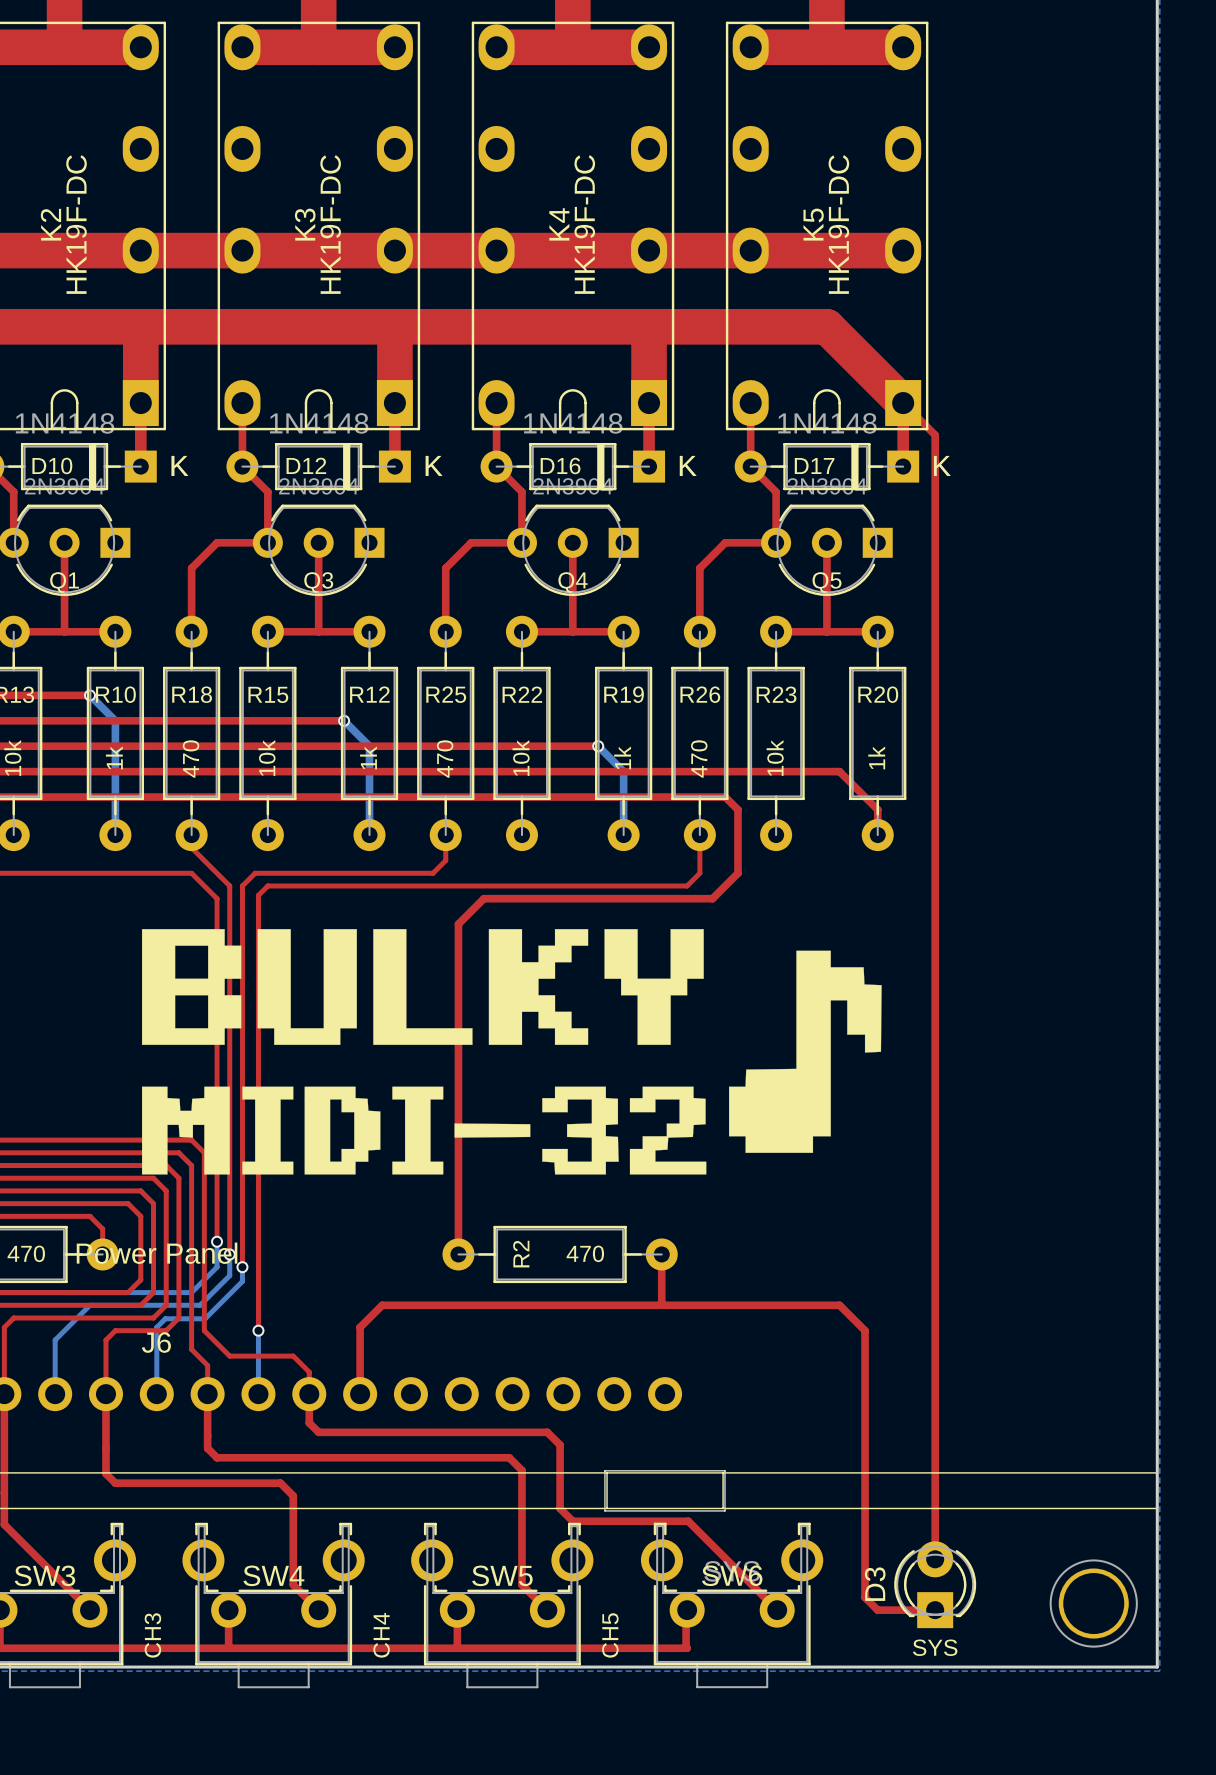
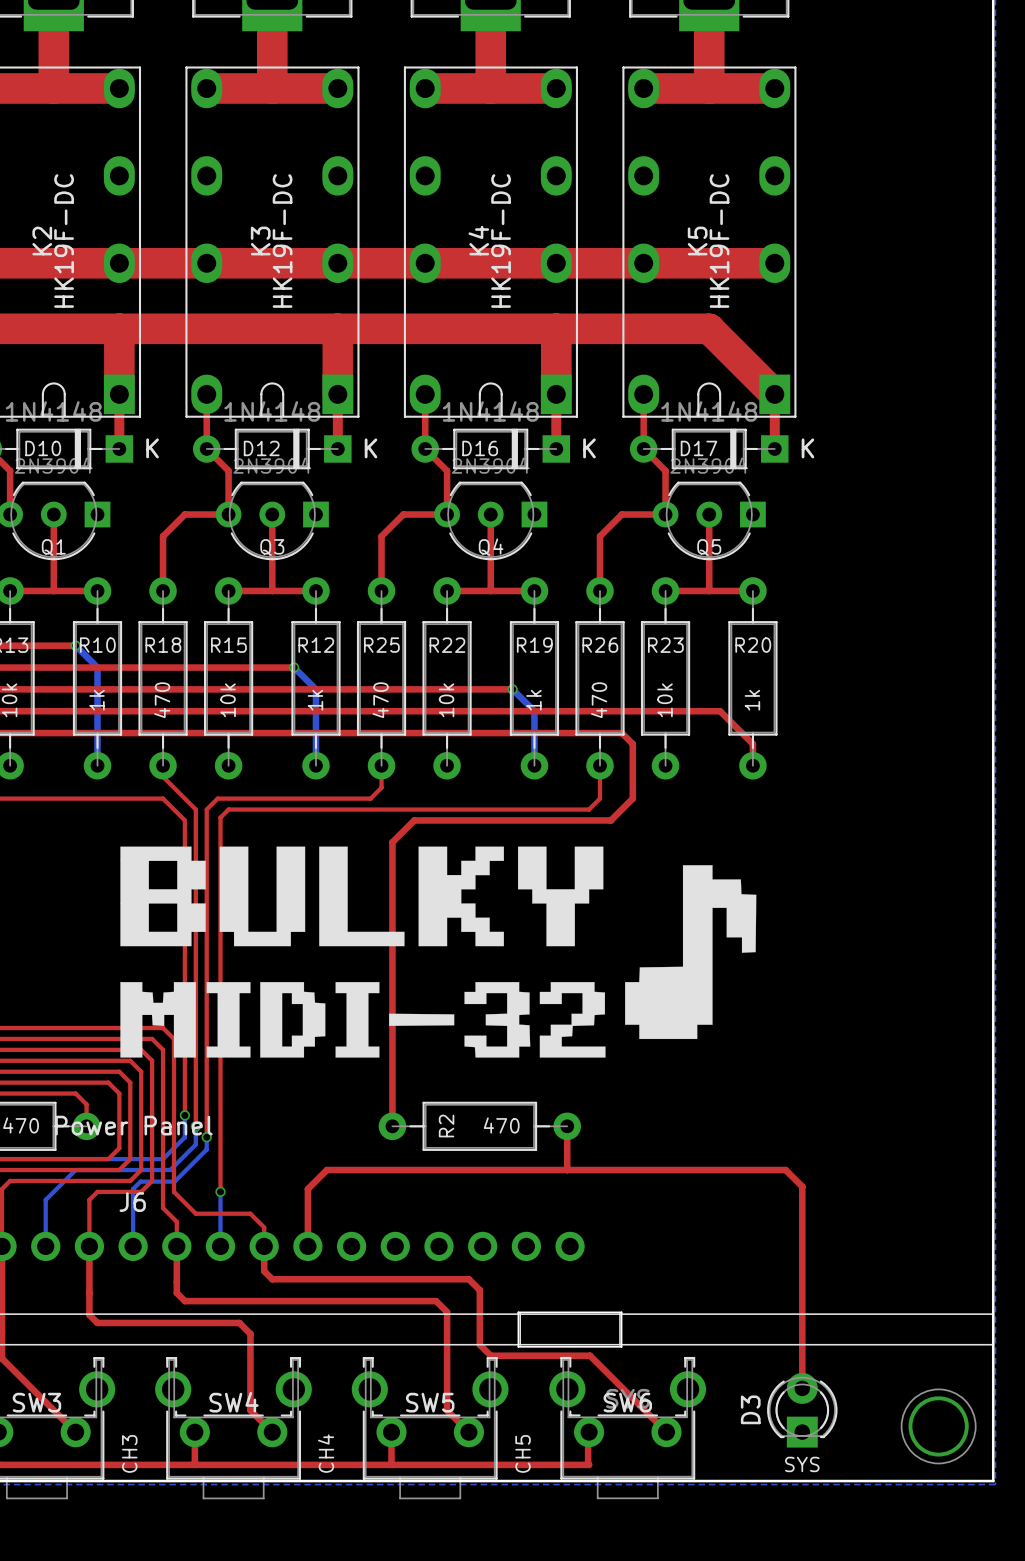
top track: (903, 403) (935, 435) (935, 1324) -> none
top track: (839, 1305) (865, 1330) (865, 1597) (877, 1610) (935, 1610) -> (720, 1170) (785, 1170) (802, 1186)

